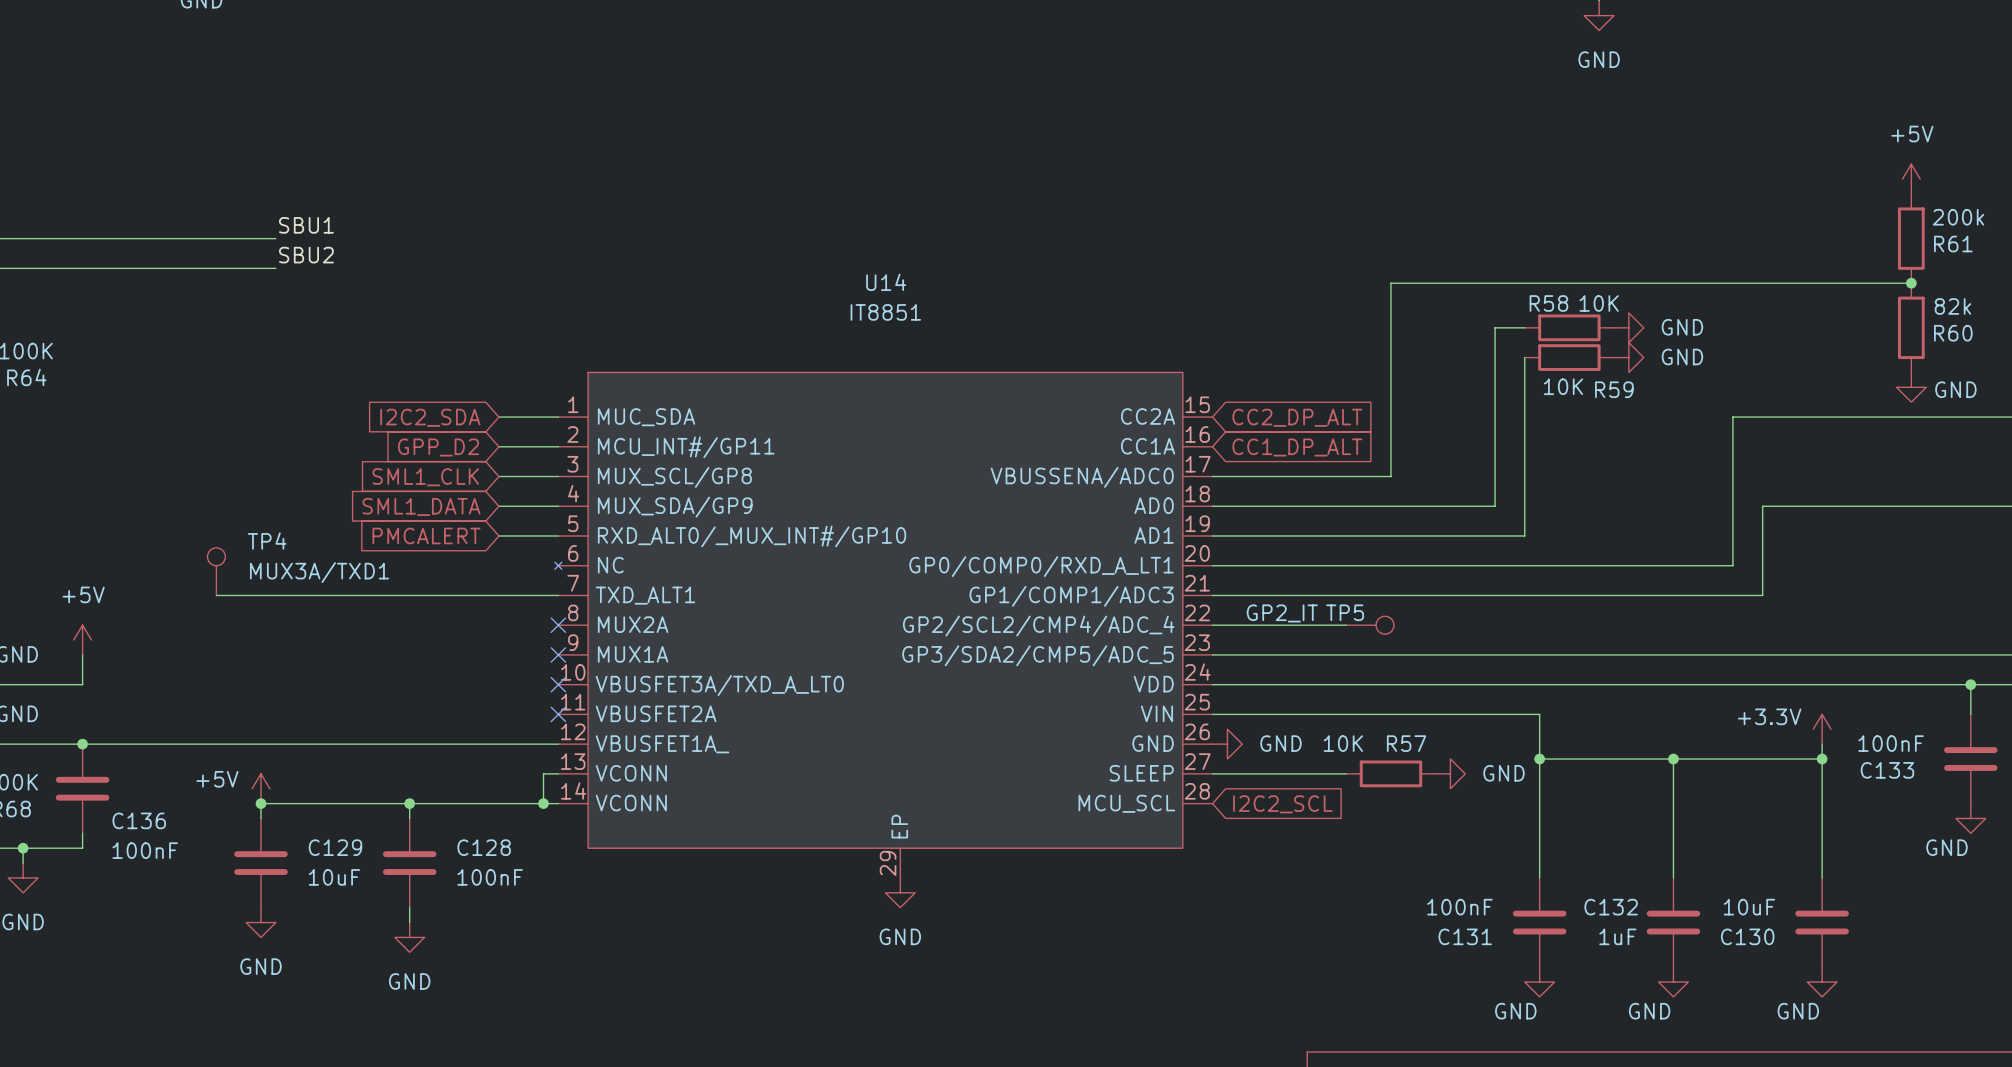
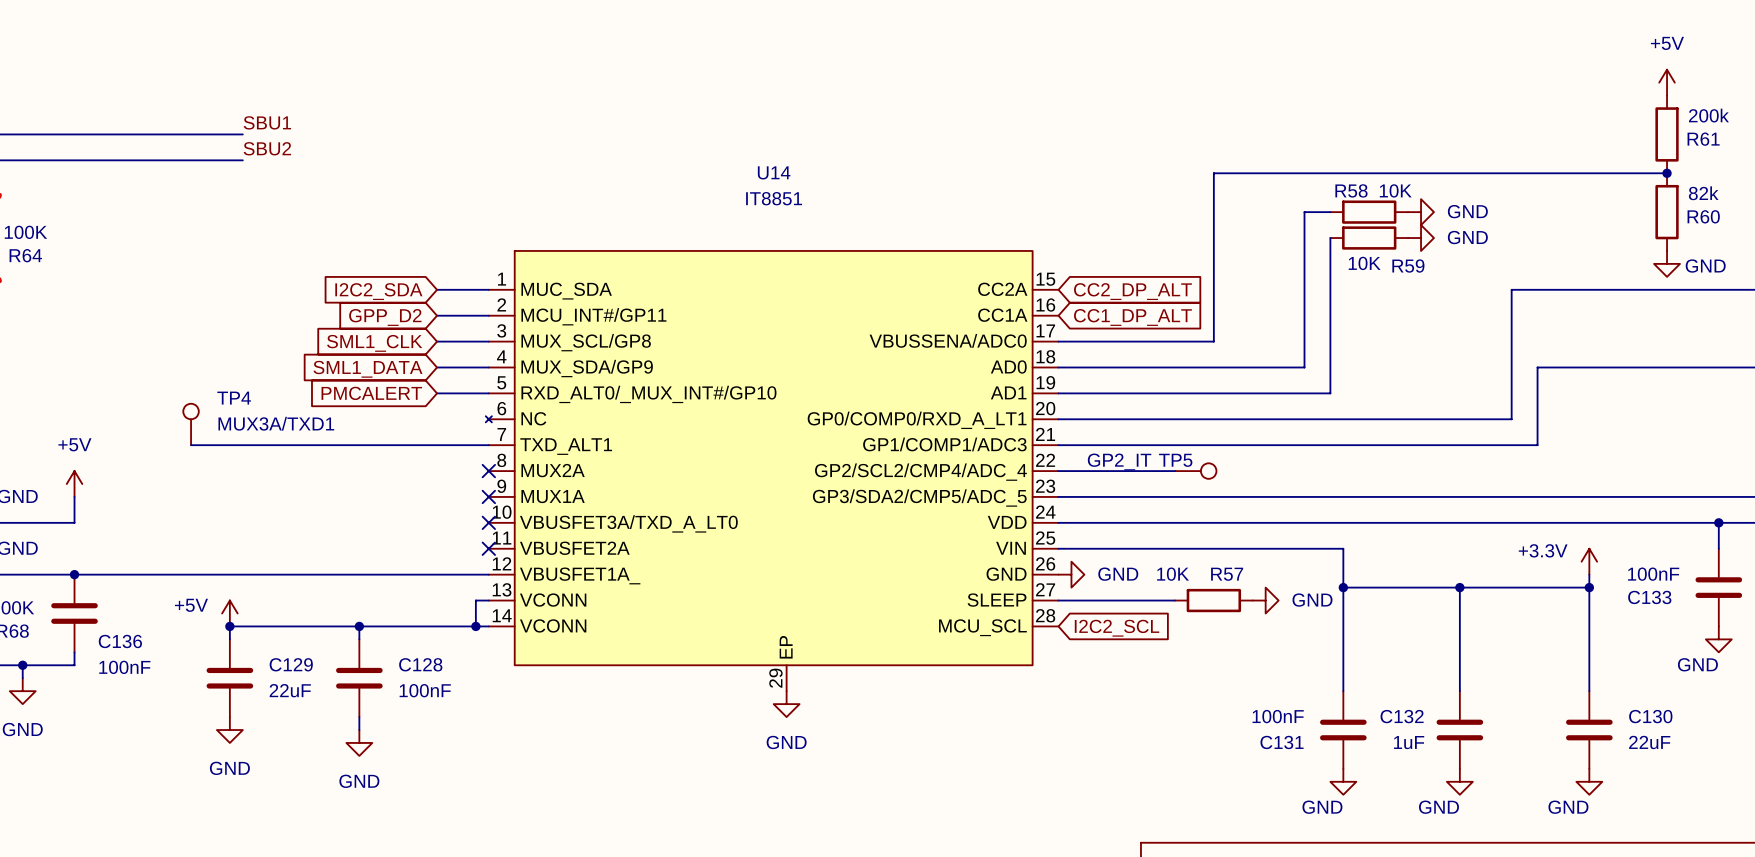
C129 value: 10uF (334, 877) -> 22uF (290, 690)
C130 value: 10uF (1749, 907) -> 22uF (1649, 742)
C130 name position: C130 (1747, 936) -> C130 (1650, 716)

